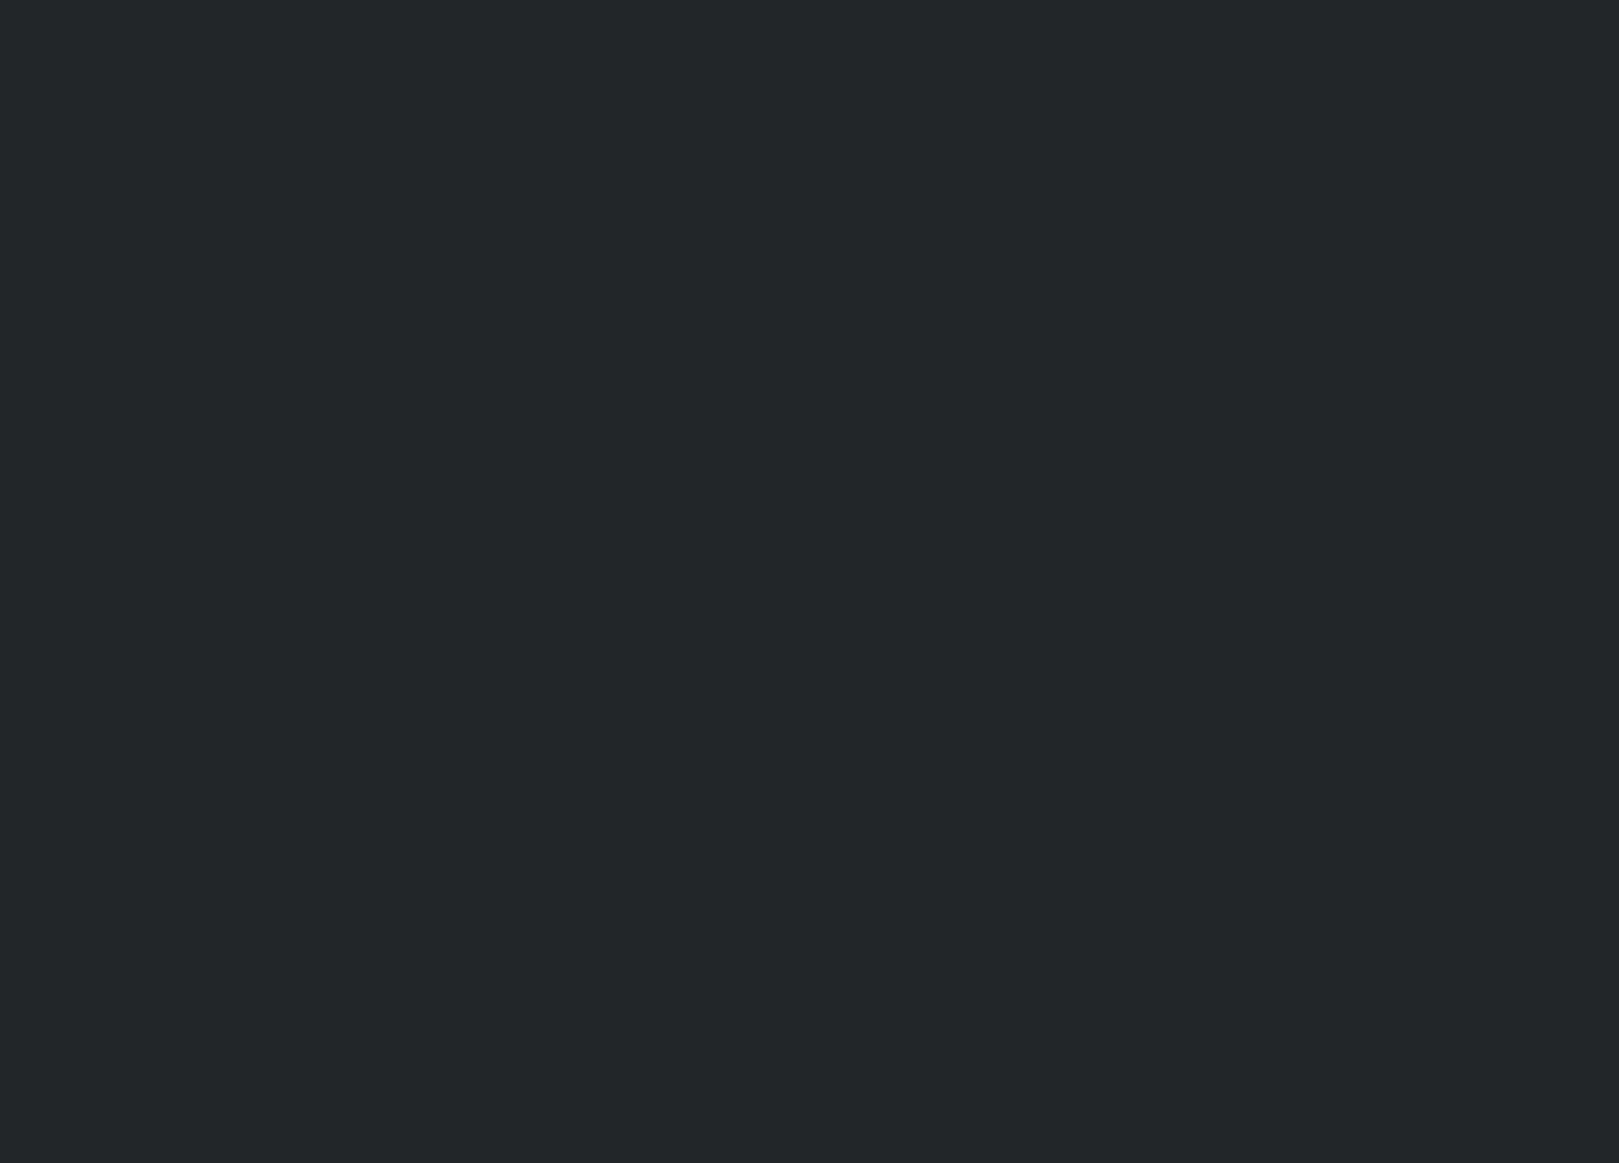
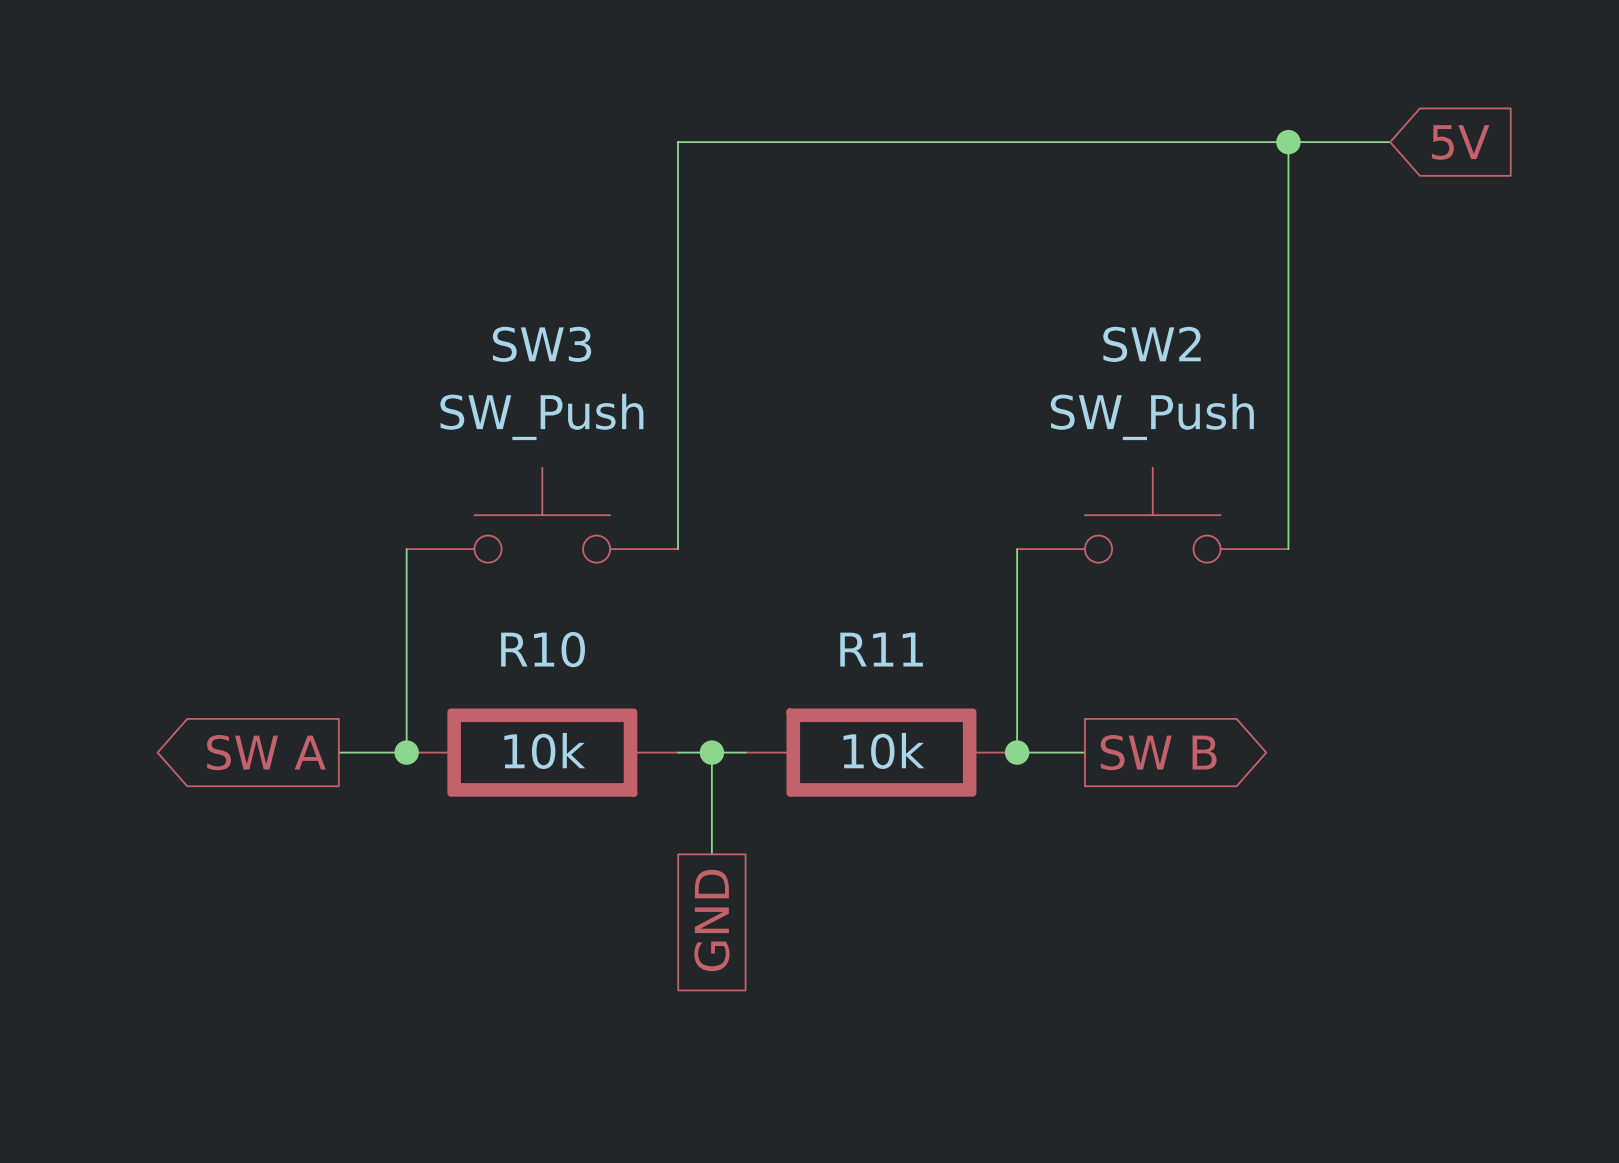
wire: none -> (1288, 142) (1288, 549)
junction: none -> (1288, 142)
wire: none -> (1390, 142) (677, 142) (677, 549)
global label: none -> 5V (1460, 142)
SW3: none -> SW_Push (542, 515)
SW2: none -> SW_Push (1152, 515)
wire: none -> (406, 549) (406, 752) (338, 752)
wire: none -> (1017, 549) (1017, 752) (1084, 752)
global label: none -> SW A (266, 752)
junction: none -> (406, 752)
R10: none -> 10k (542, 752)
wire: none -> (677, 752) (745, 752)
wire: none -> (711, 752) (711, 854)
junction: none -> (711, 752)
R11: none -> 10k (881, 752)
junction: none -> (1017, 752)
global label: none -> SW B (1158, 752)
global label: none -> GND (711, 920)

